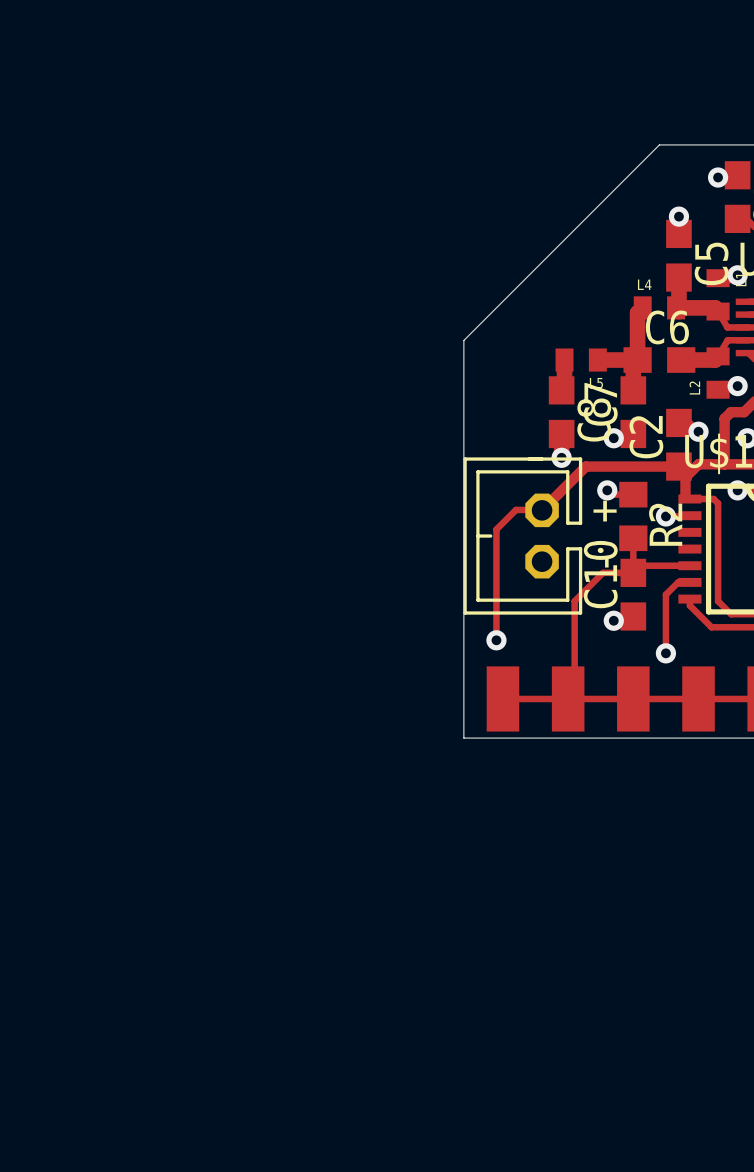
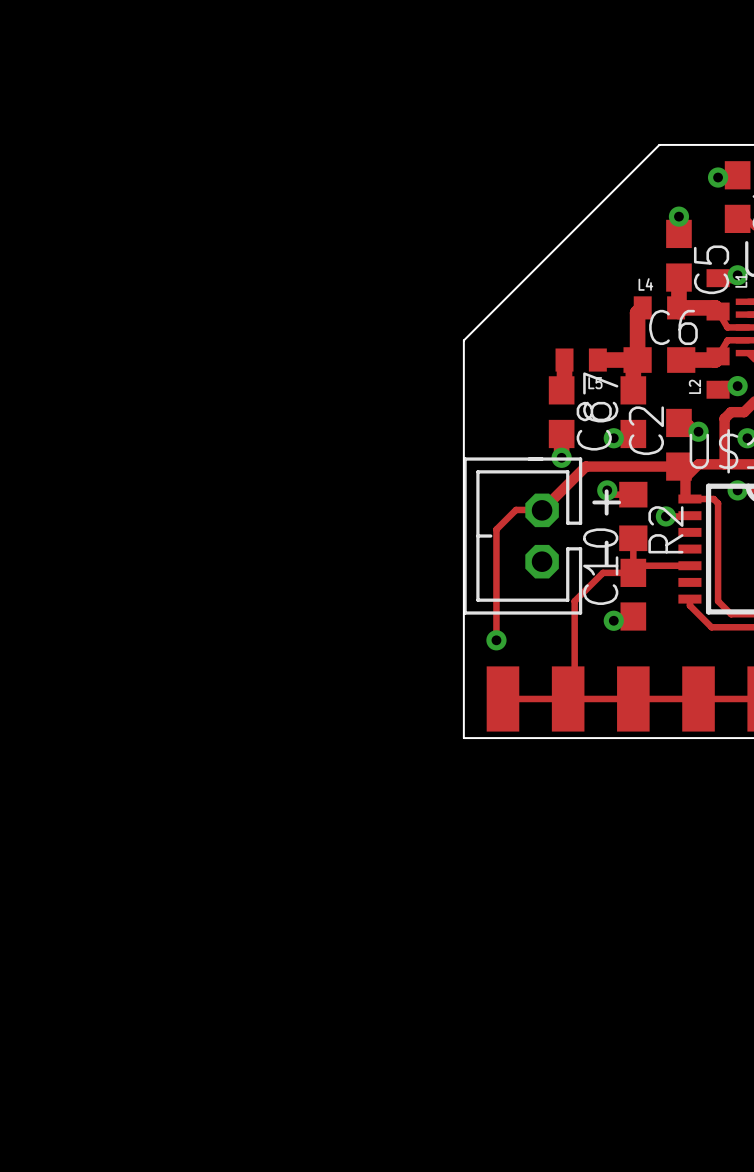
track: (689, 582) (678, 582) (665, 594) (665, 653) -> none
via: (665, 653) -> none

